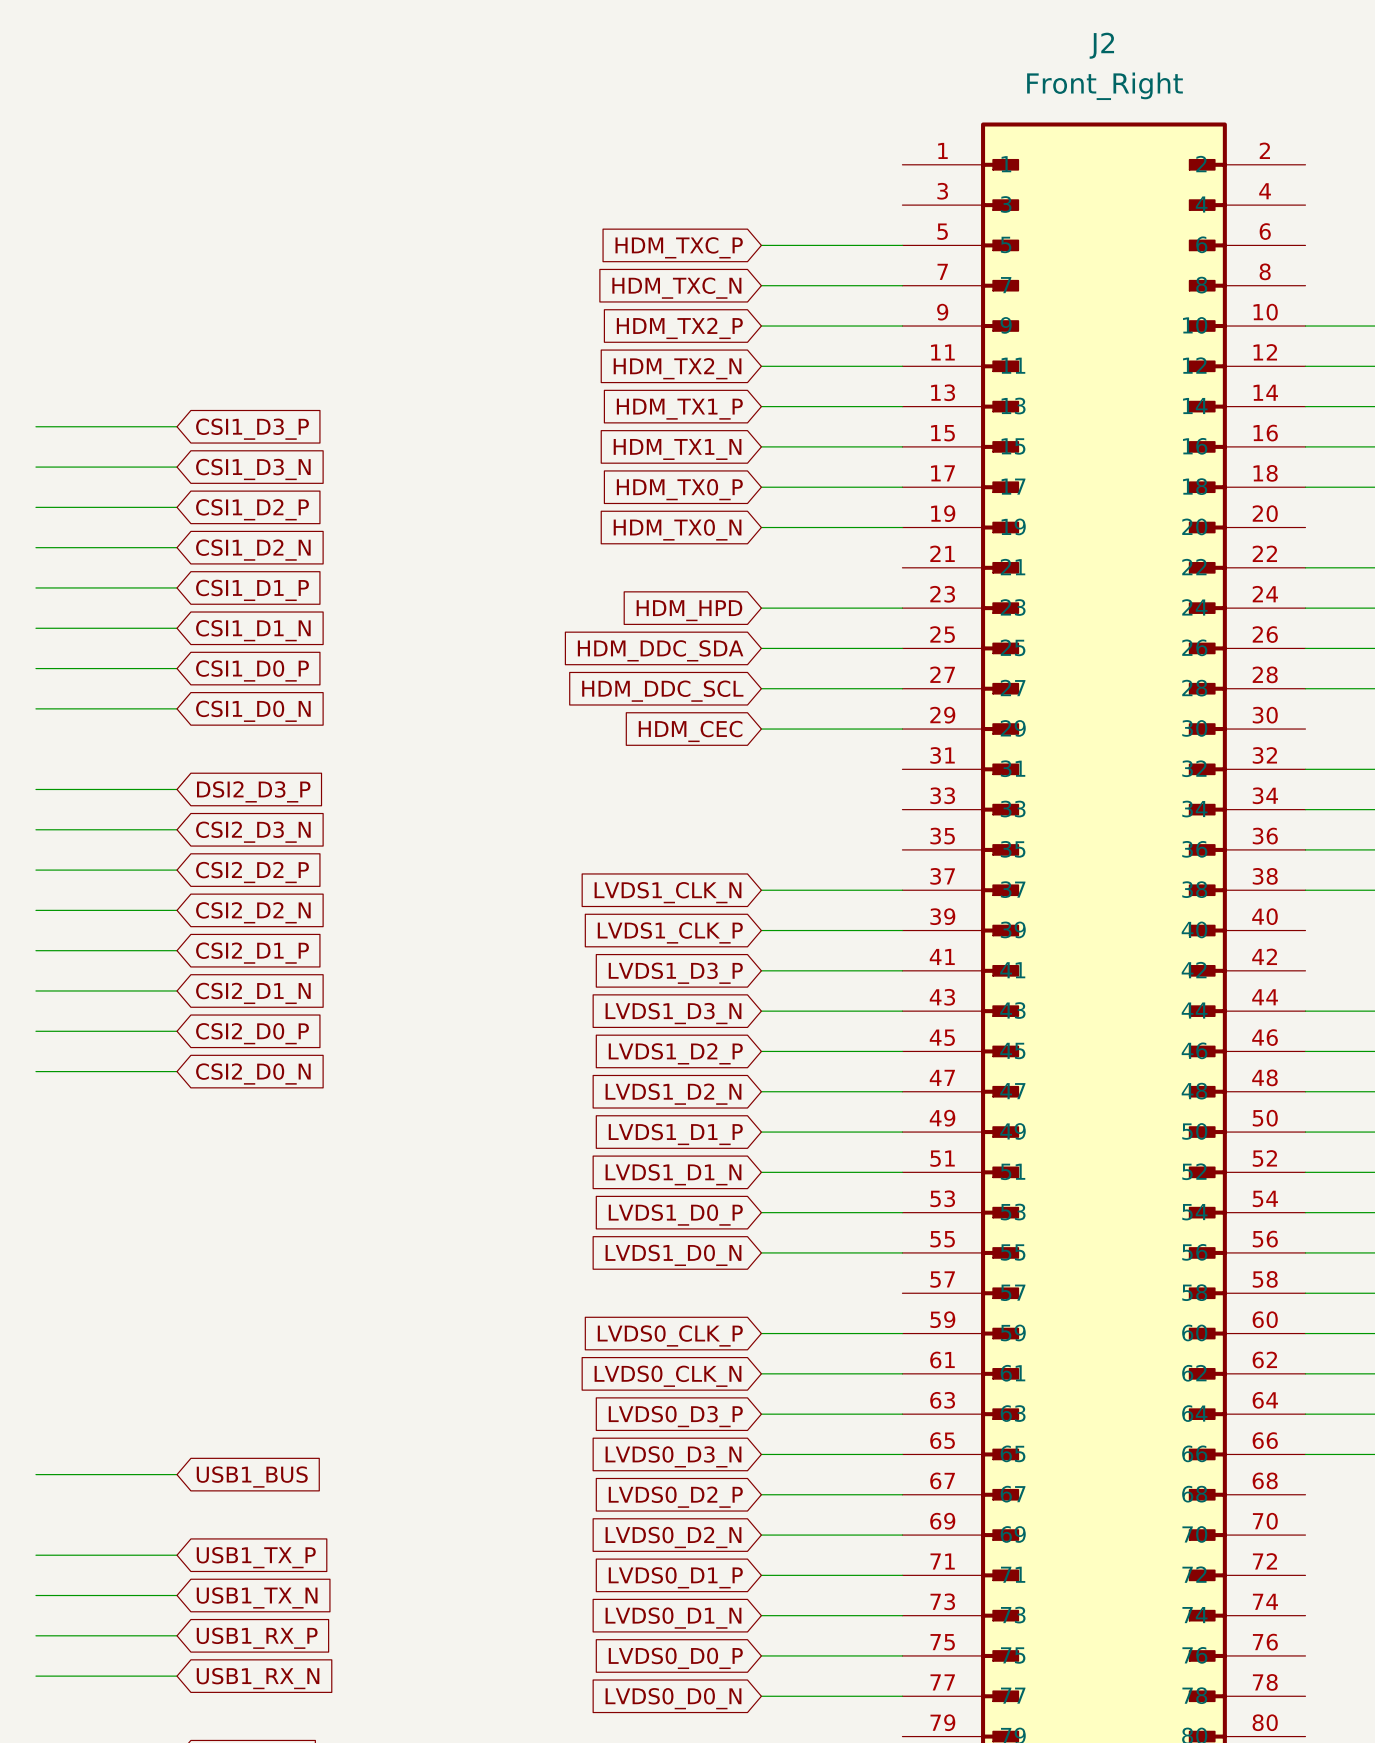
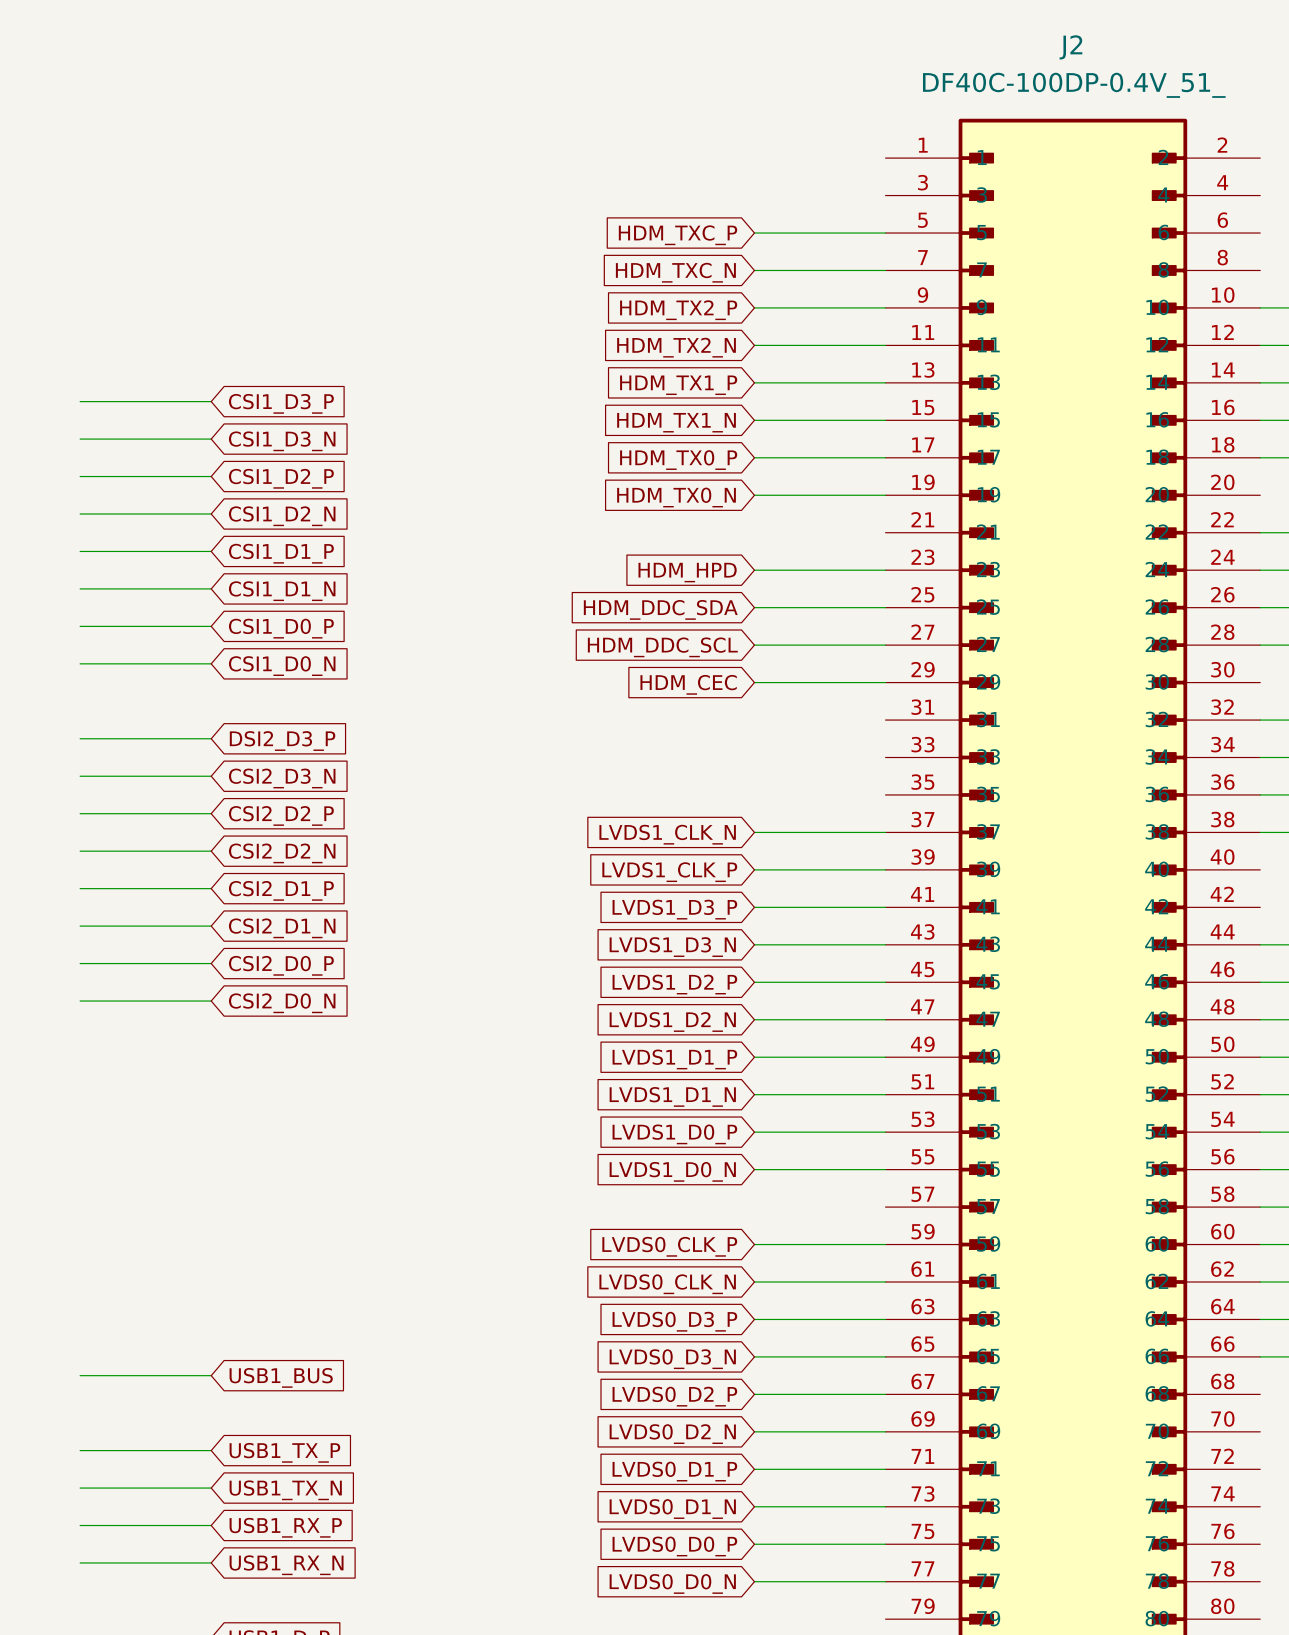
J2 value: Front_Right (1104, 86) -> DF40C-100DP-0.4V_51_ (1074, 85)

